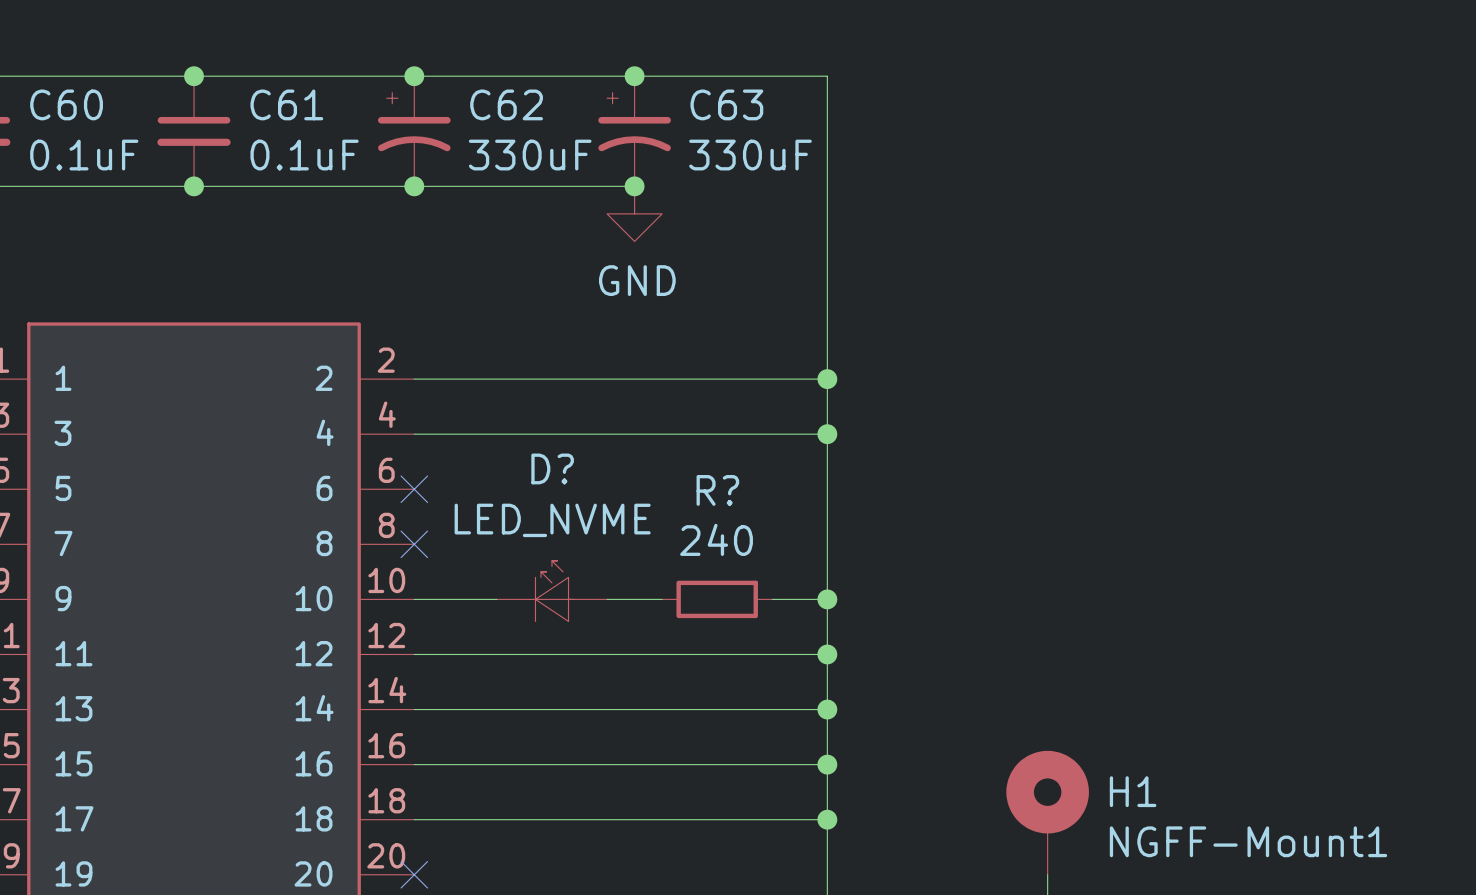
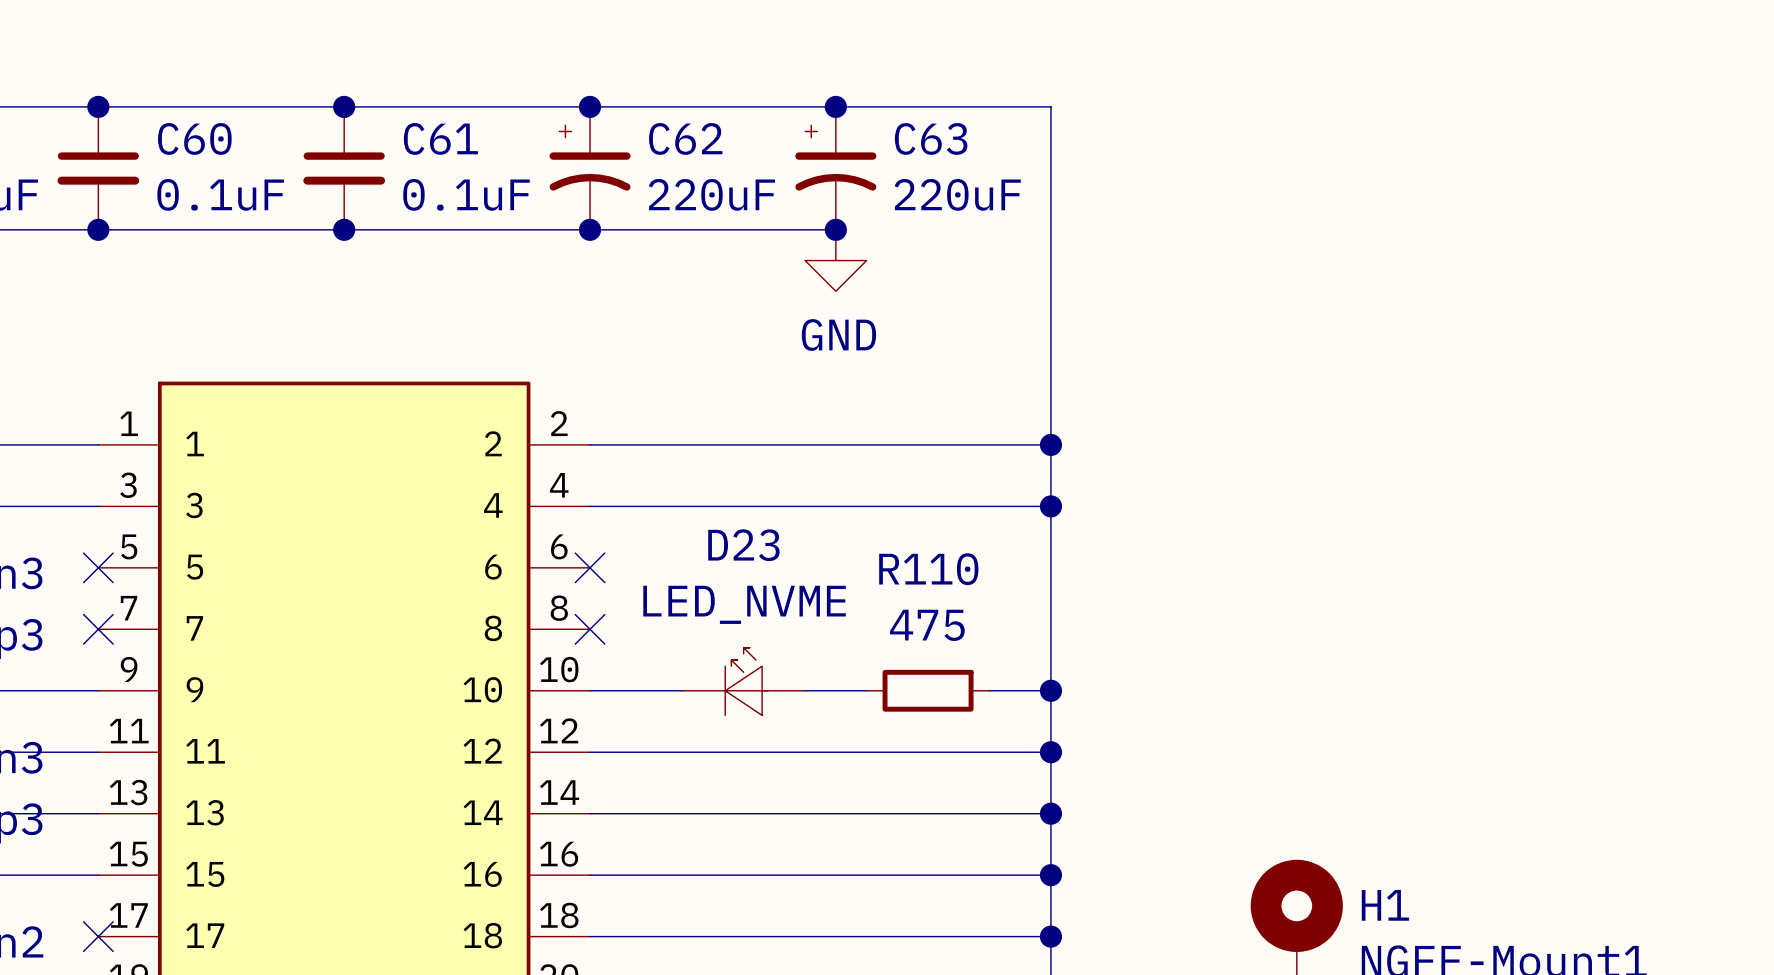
C62 value: 330uF (530, 155) -> 220uF (711, 194)
C63 value: 330uF (750, 155) -> 220uF (957, 194)
D? name: D? (552, 468) -> D23 (743, 545)
R? name: R? (717, 490) -> R110 (928, 569)
R? value: 240 (716, 539) -> 475 (927, 625)

